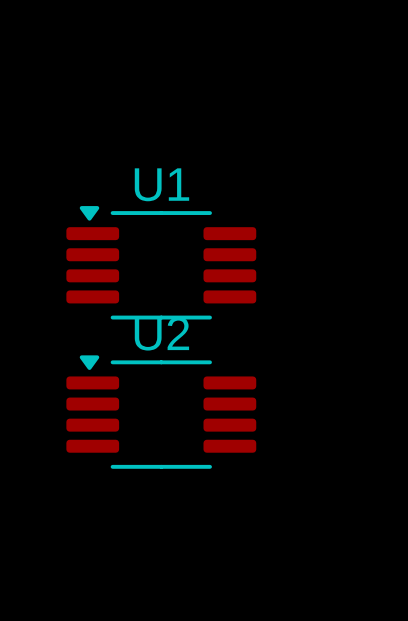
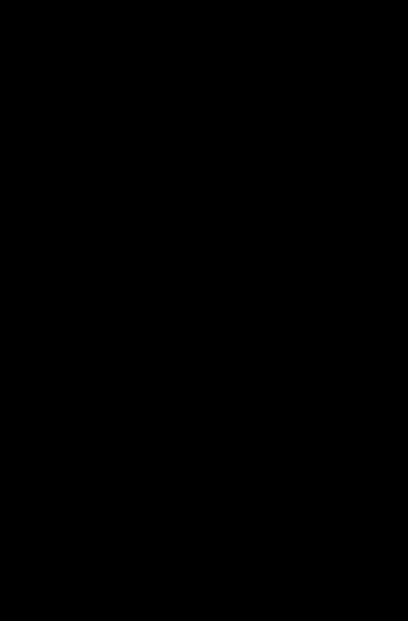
U1: (161, 262) -> none
U2: (161, 412) -> none

